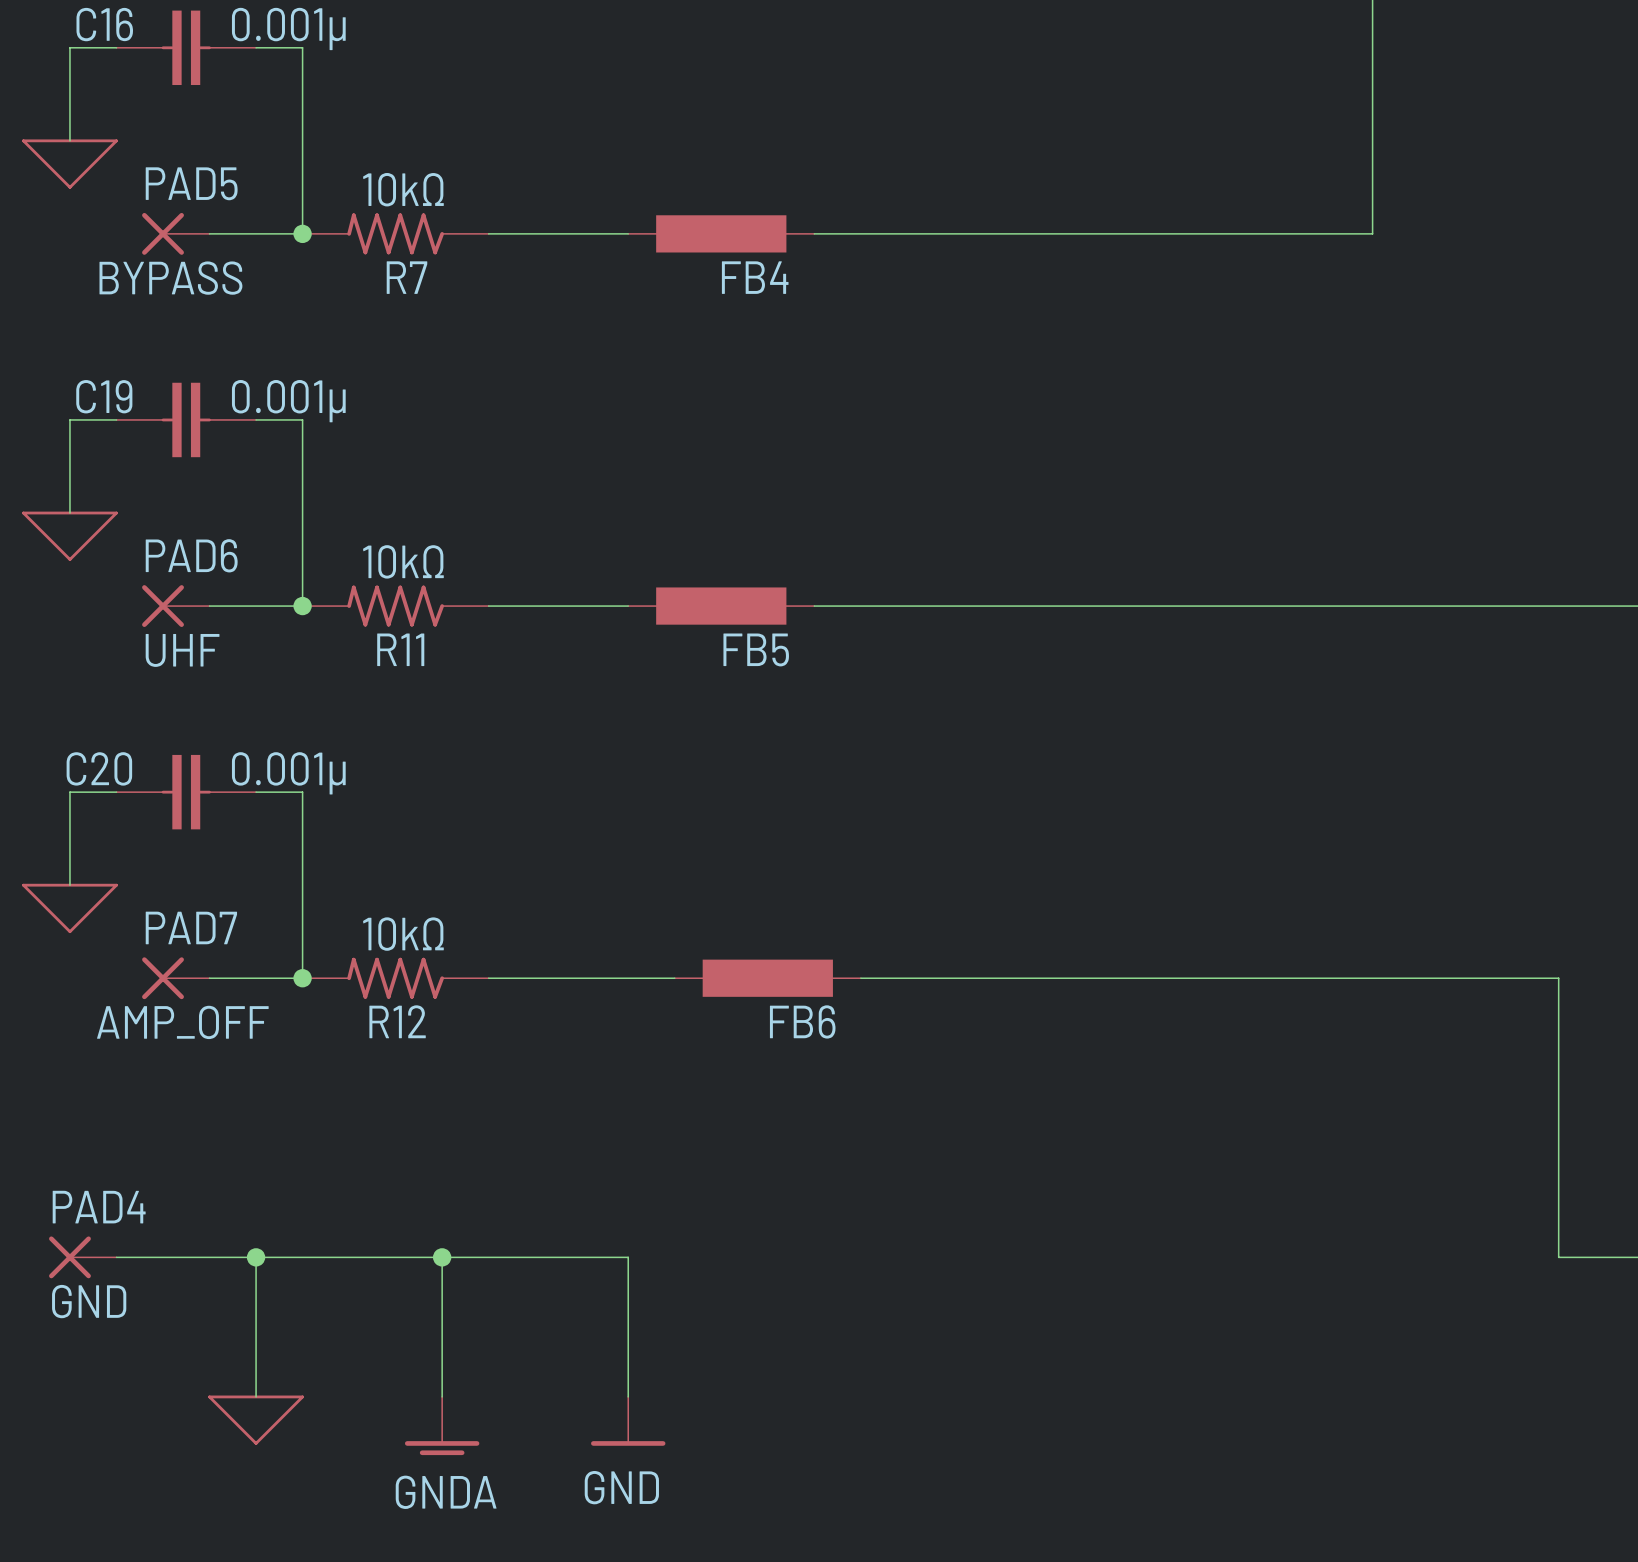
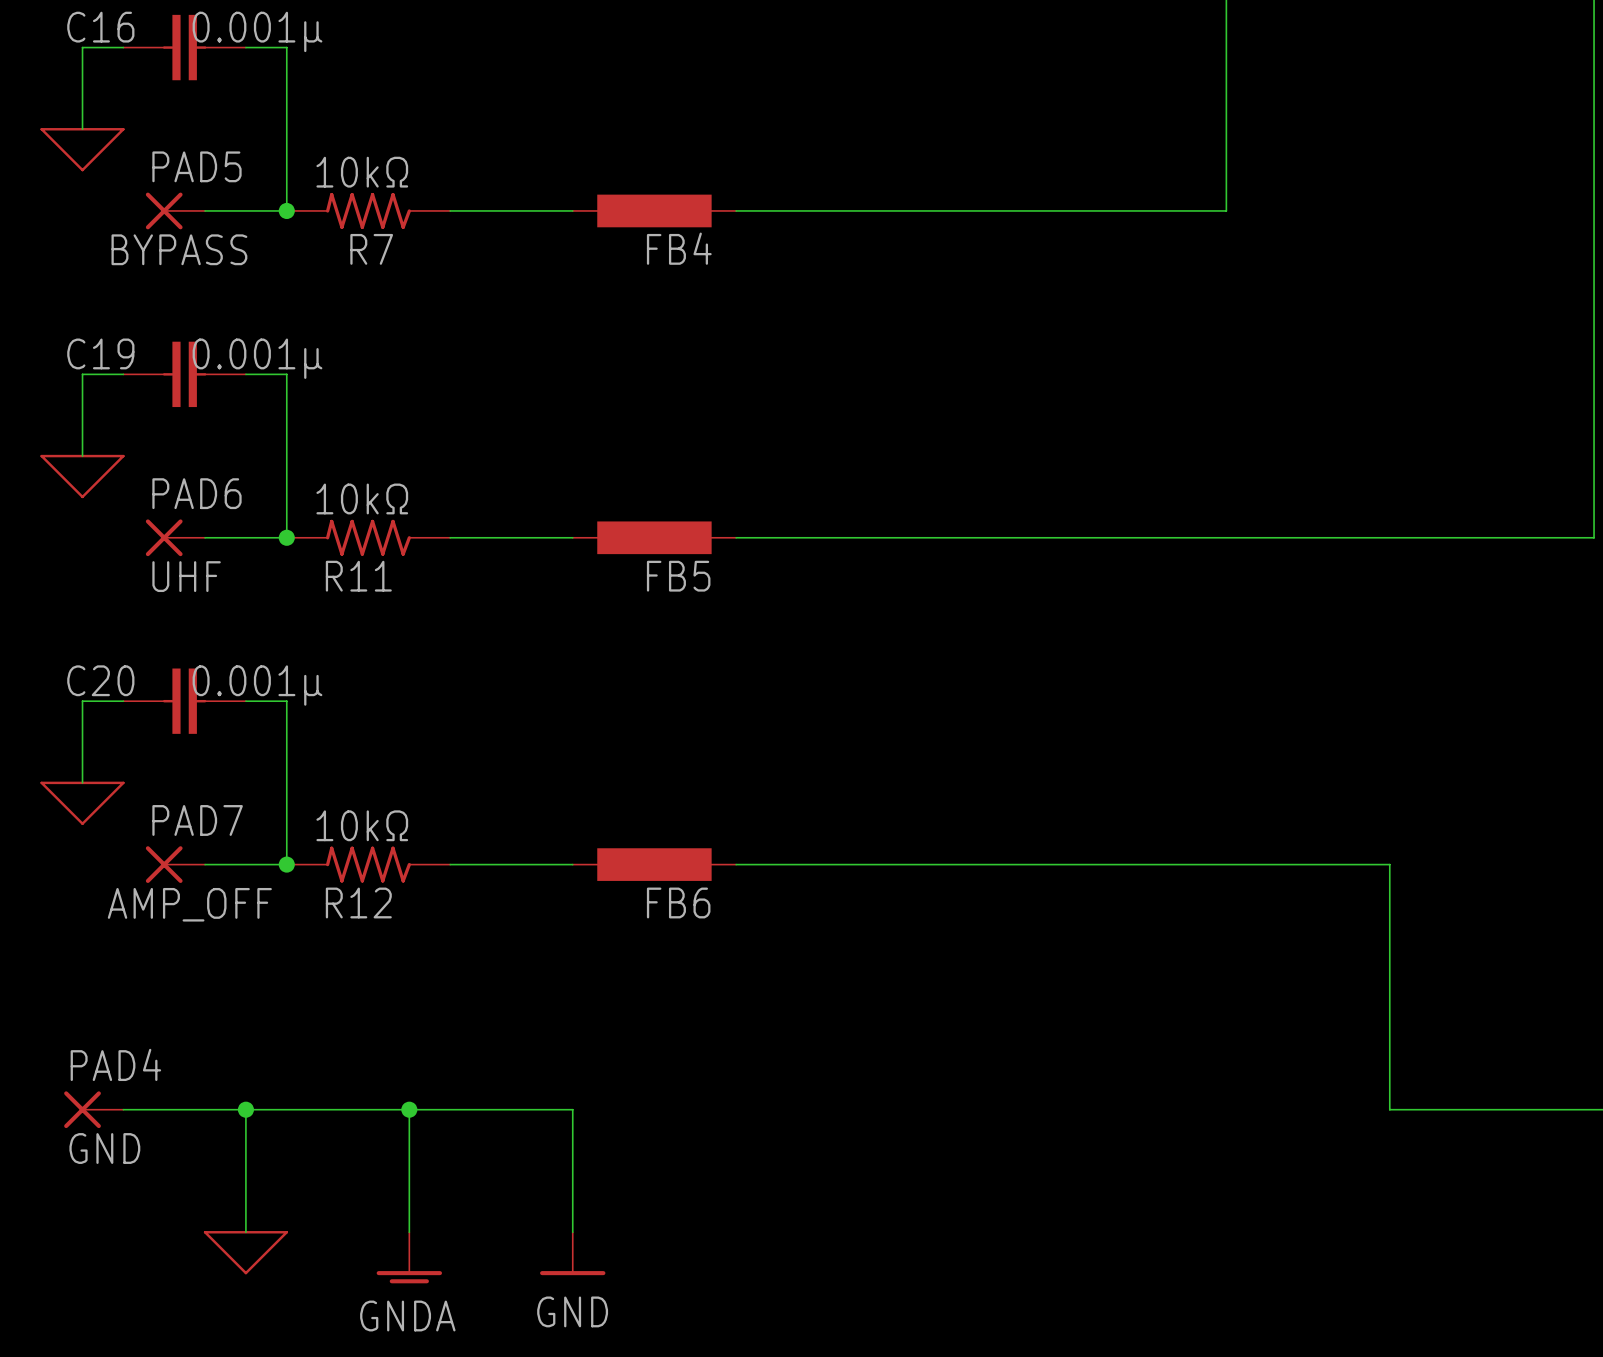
FB6 position: (767, 978) -> (654, 864)

